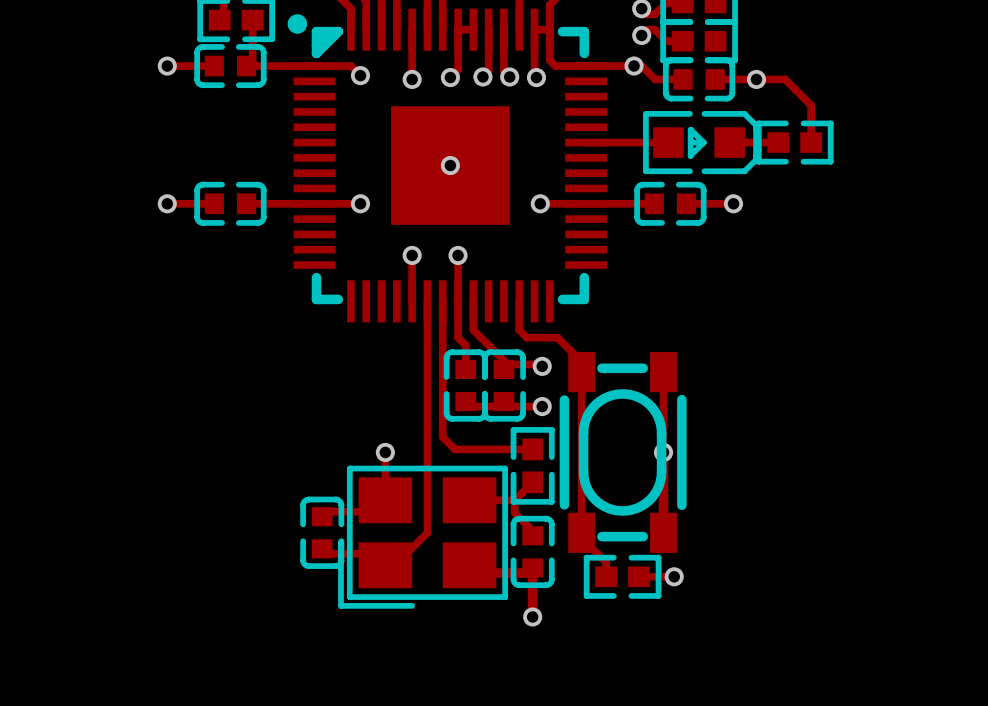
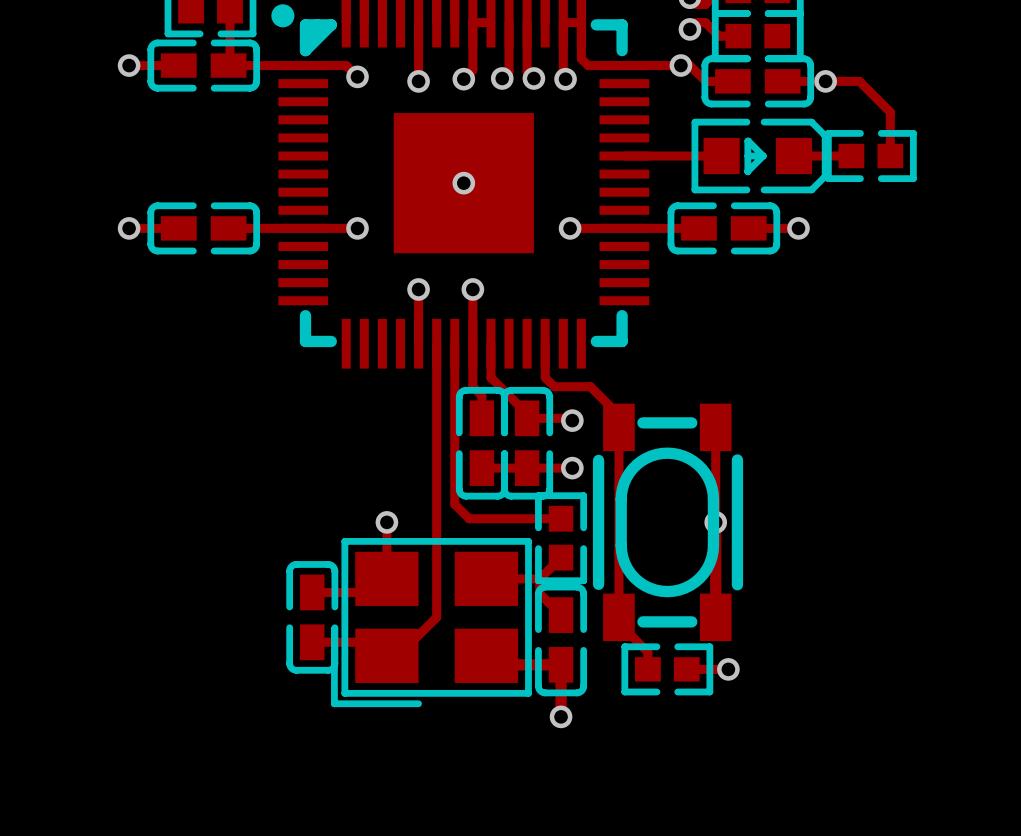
part footprint: [194, 44, 267, 89] -> [147, 39, 261, 92]
part footprint: [662, 57, 736, 102] -> [701, 55, 815, 108]
part footprint: [194, 181, 267, 226] -> [147, 202, 261, 255]
part footprint: [634, 181, 707, 226] -> [667, 202, 781, 255]
part footprint: [443, 349, 488, 422] -> [455, 386, 508, 500]
part footprint: [481, 349, 526, 422] -> [501, 386, 554, 500]
part footprint: [300, 496, 345, 569] -> [286, 561, 339, 674]
part footprint: [510, 515, 555, 589] -> [535, 583, 588, 697]

